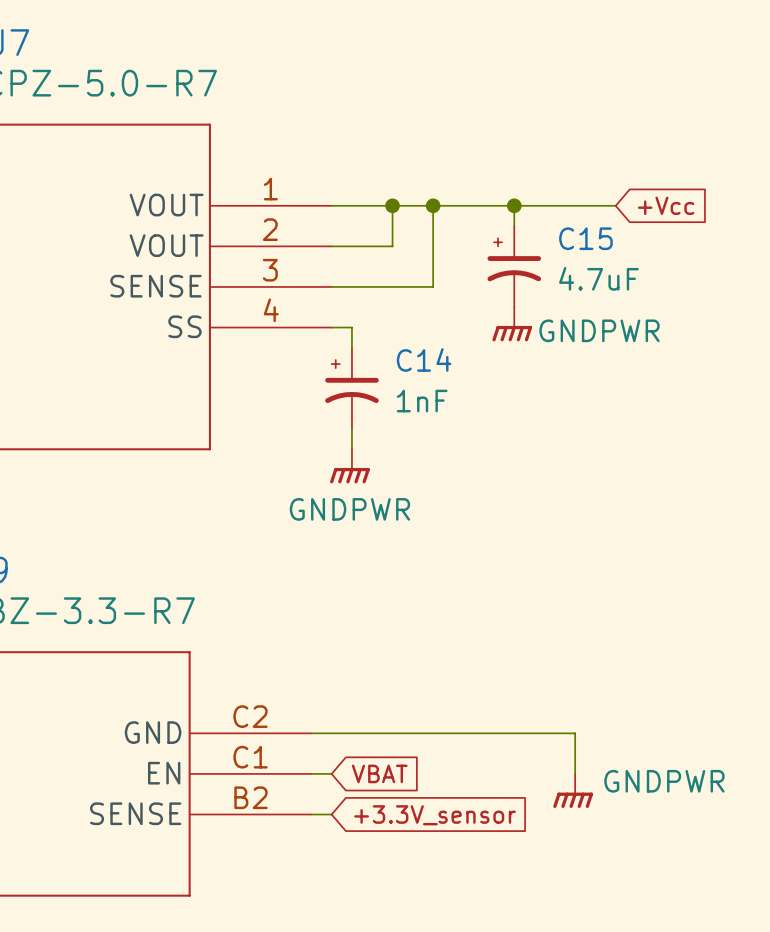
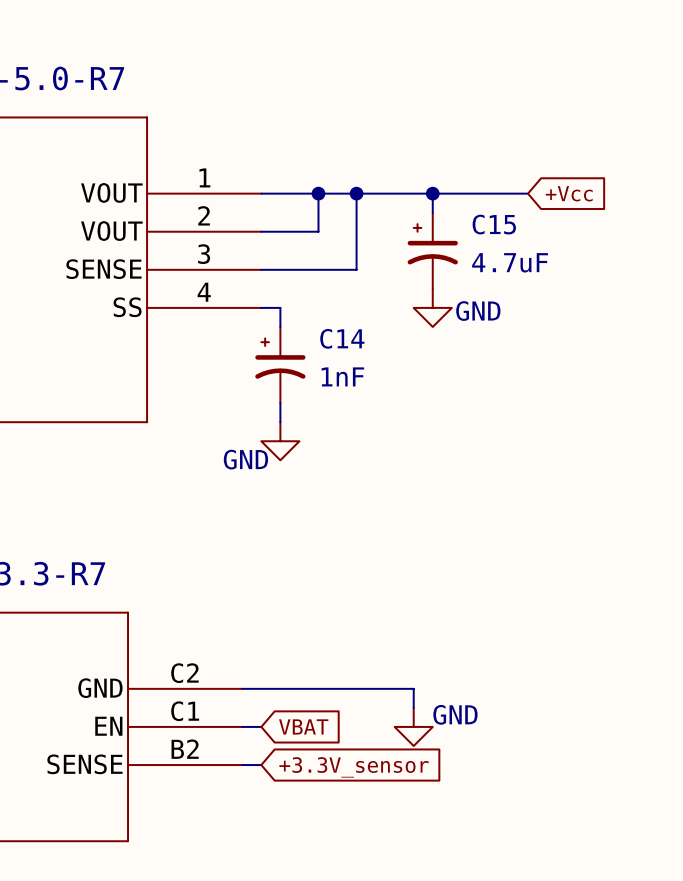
power symbol: GNDPWR (512, 324) -> GND (432, 307)
power symbol: GNDPWR (349, 466) -> GND (280, 441)
wire: (494, 733) (575, 733) (575, 773) -> (413, 688) (413, 707)
power symbol: none -> GND (413, 726)
power symbol: GNDPWR (573, 790) -> none

